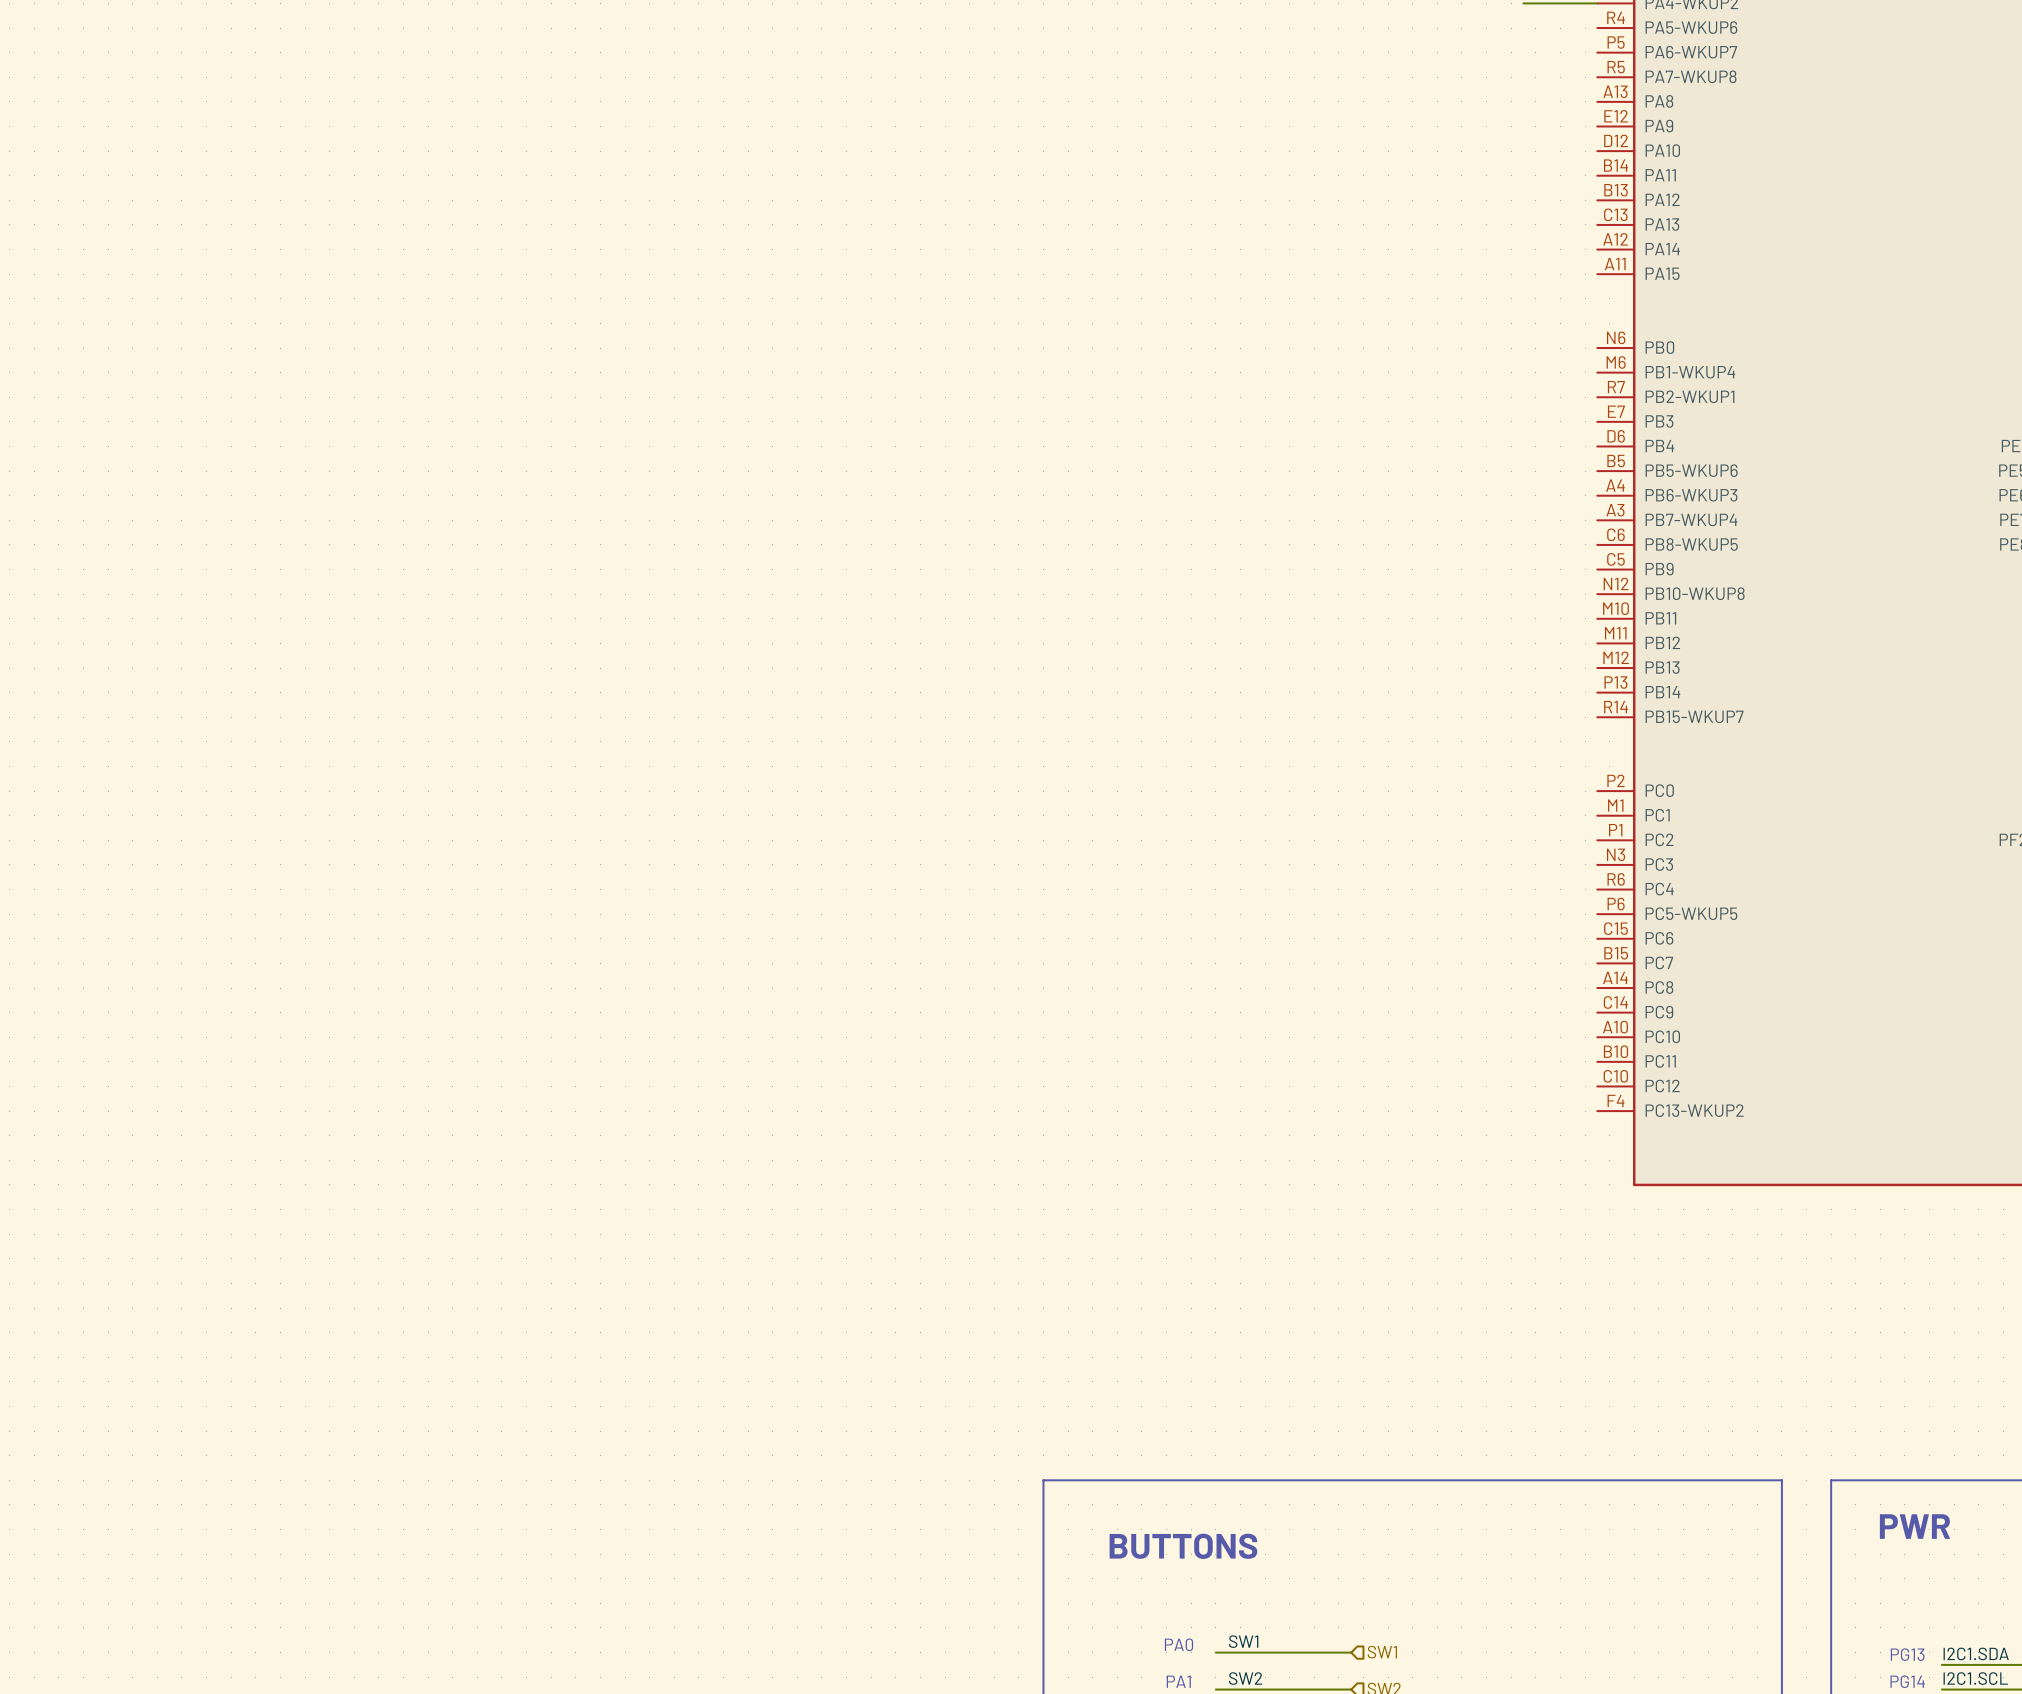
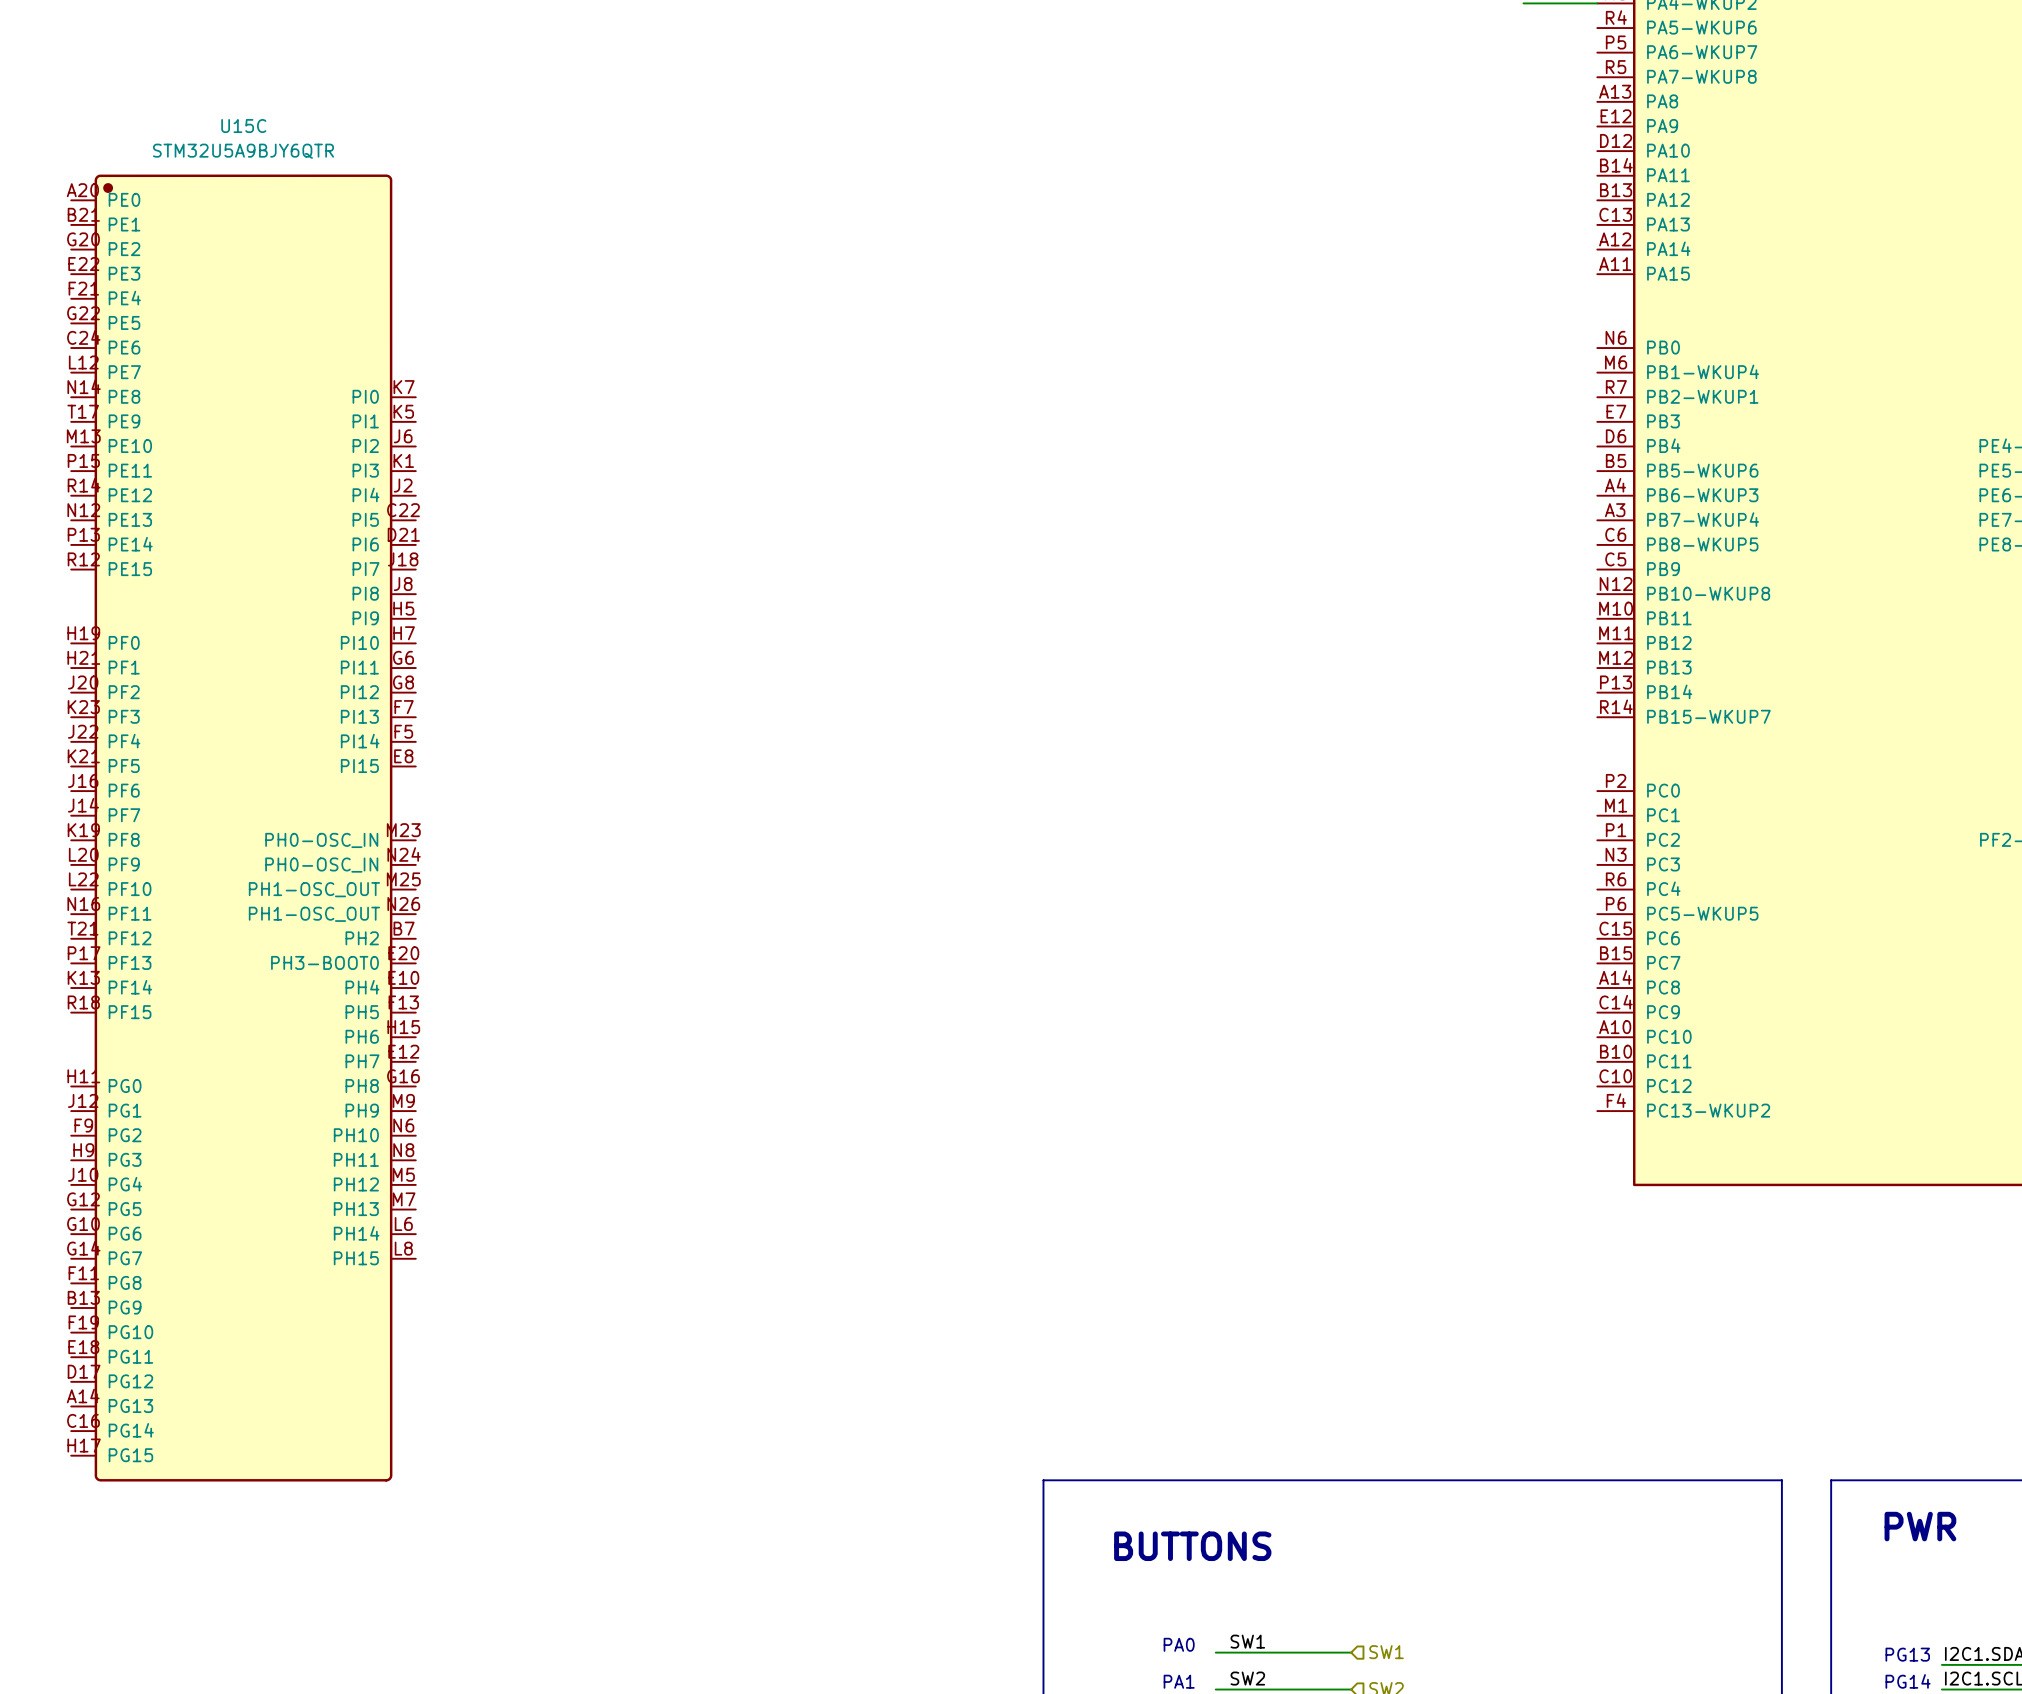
U15C: none -> STM32U5A9BJY6QTR (243, 828)

